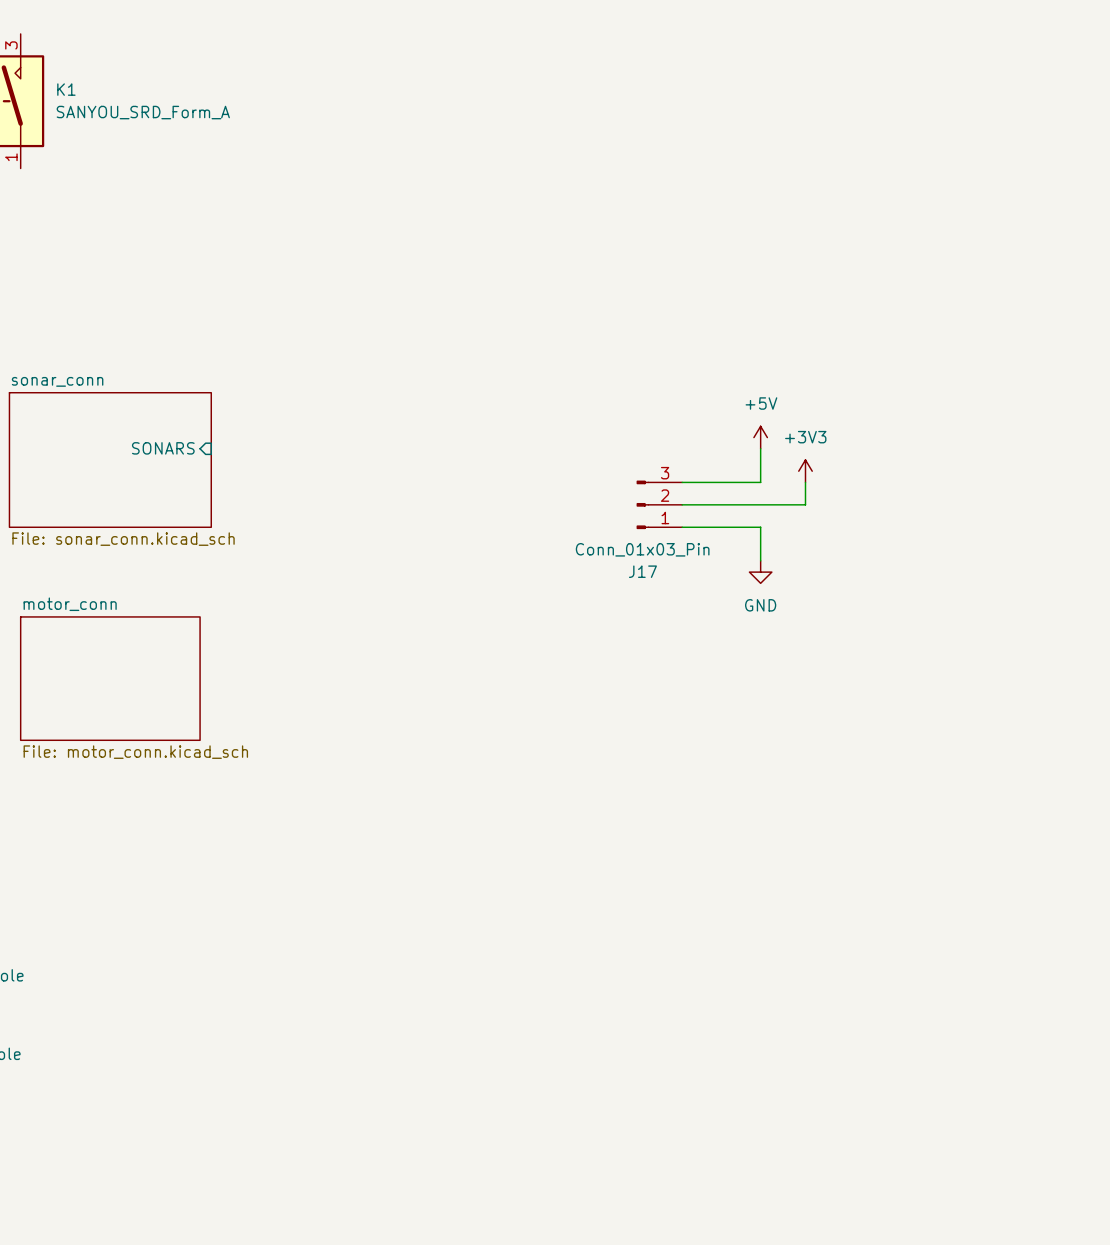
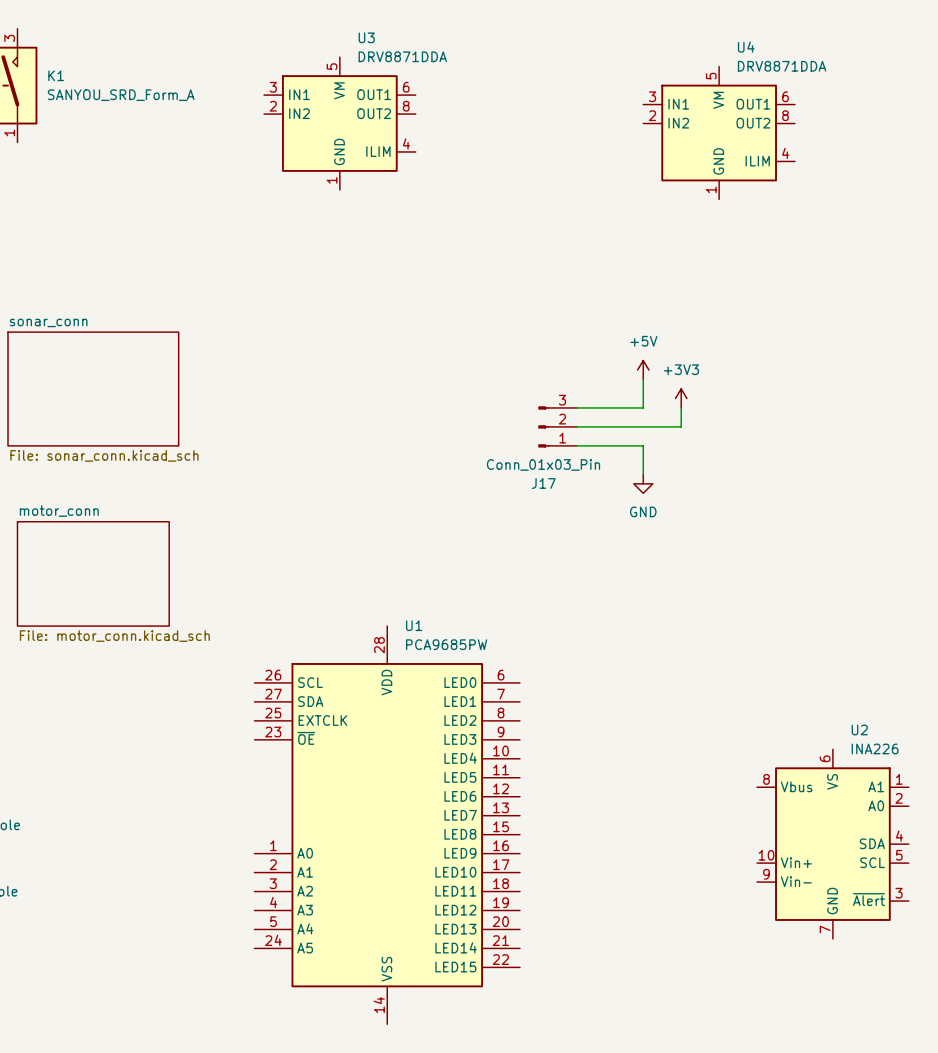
U3: none -> DRV8871DDA (339, 123)
U4: none -> DRV8871DDA (719, 133)
sheet pin: SONARS (163, 448) -> none
U1: none -> PCA9685PW (387, 825)
U2: none -> INA226 (832, 844)

